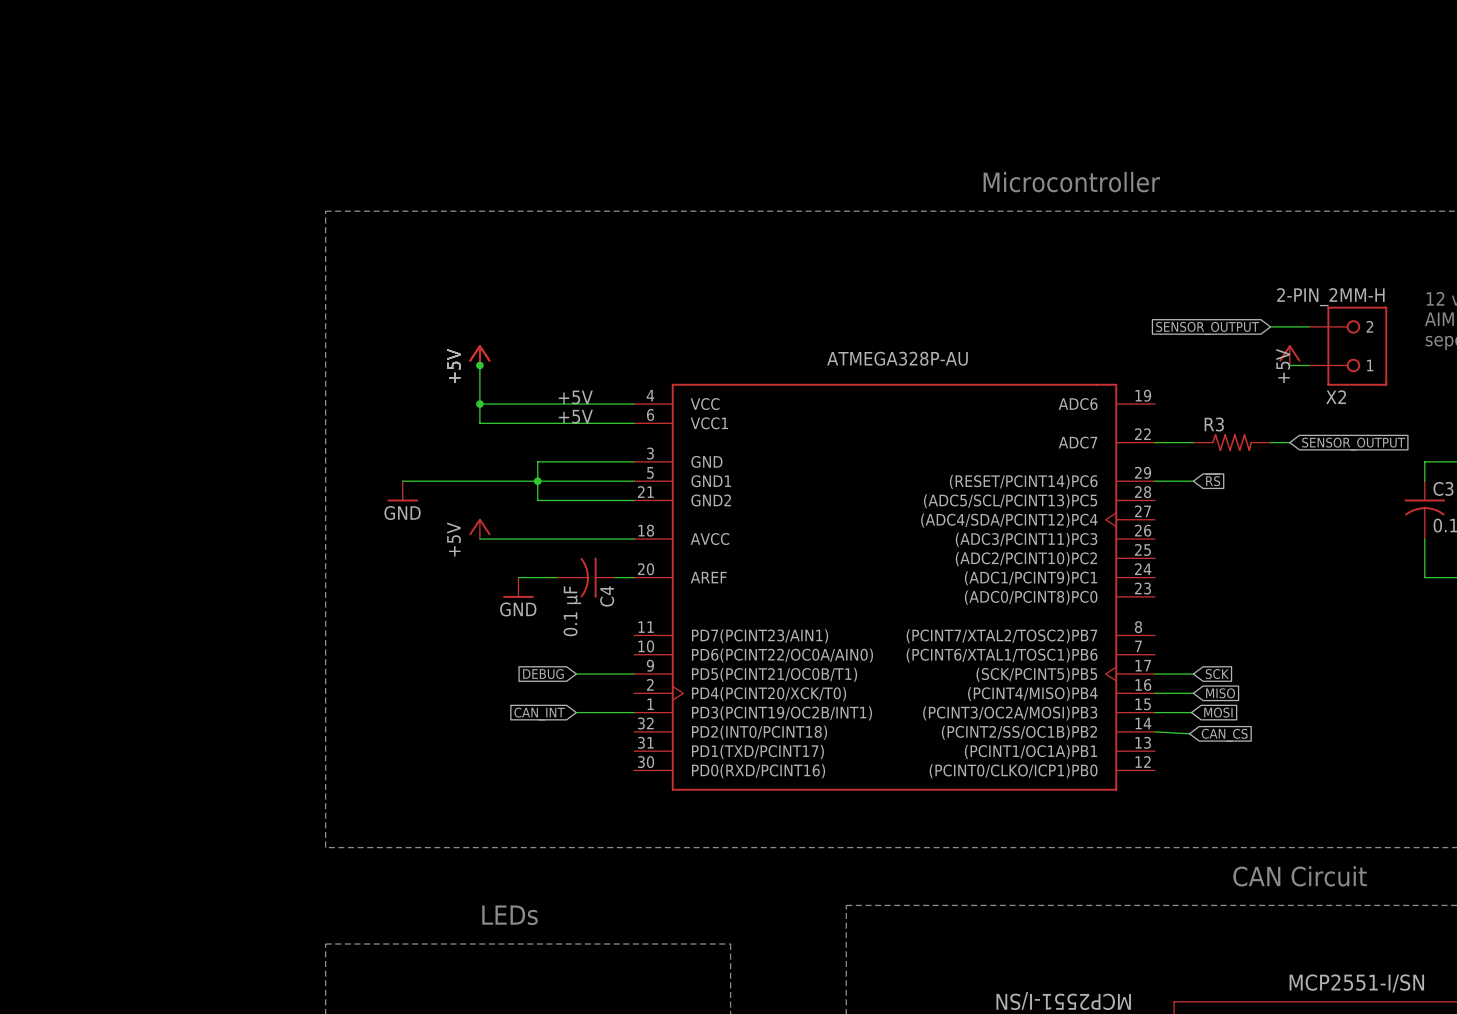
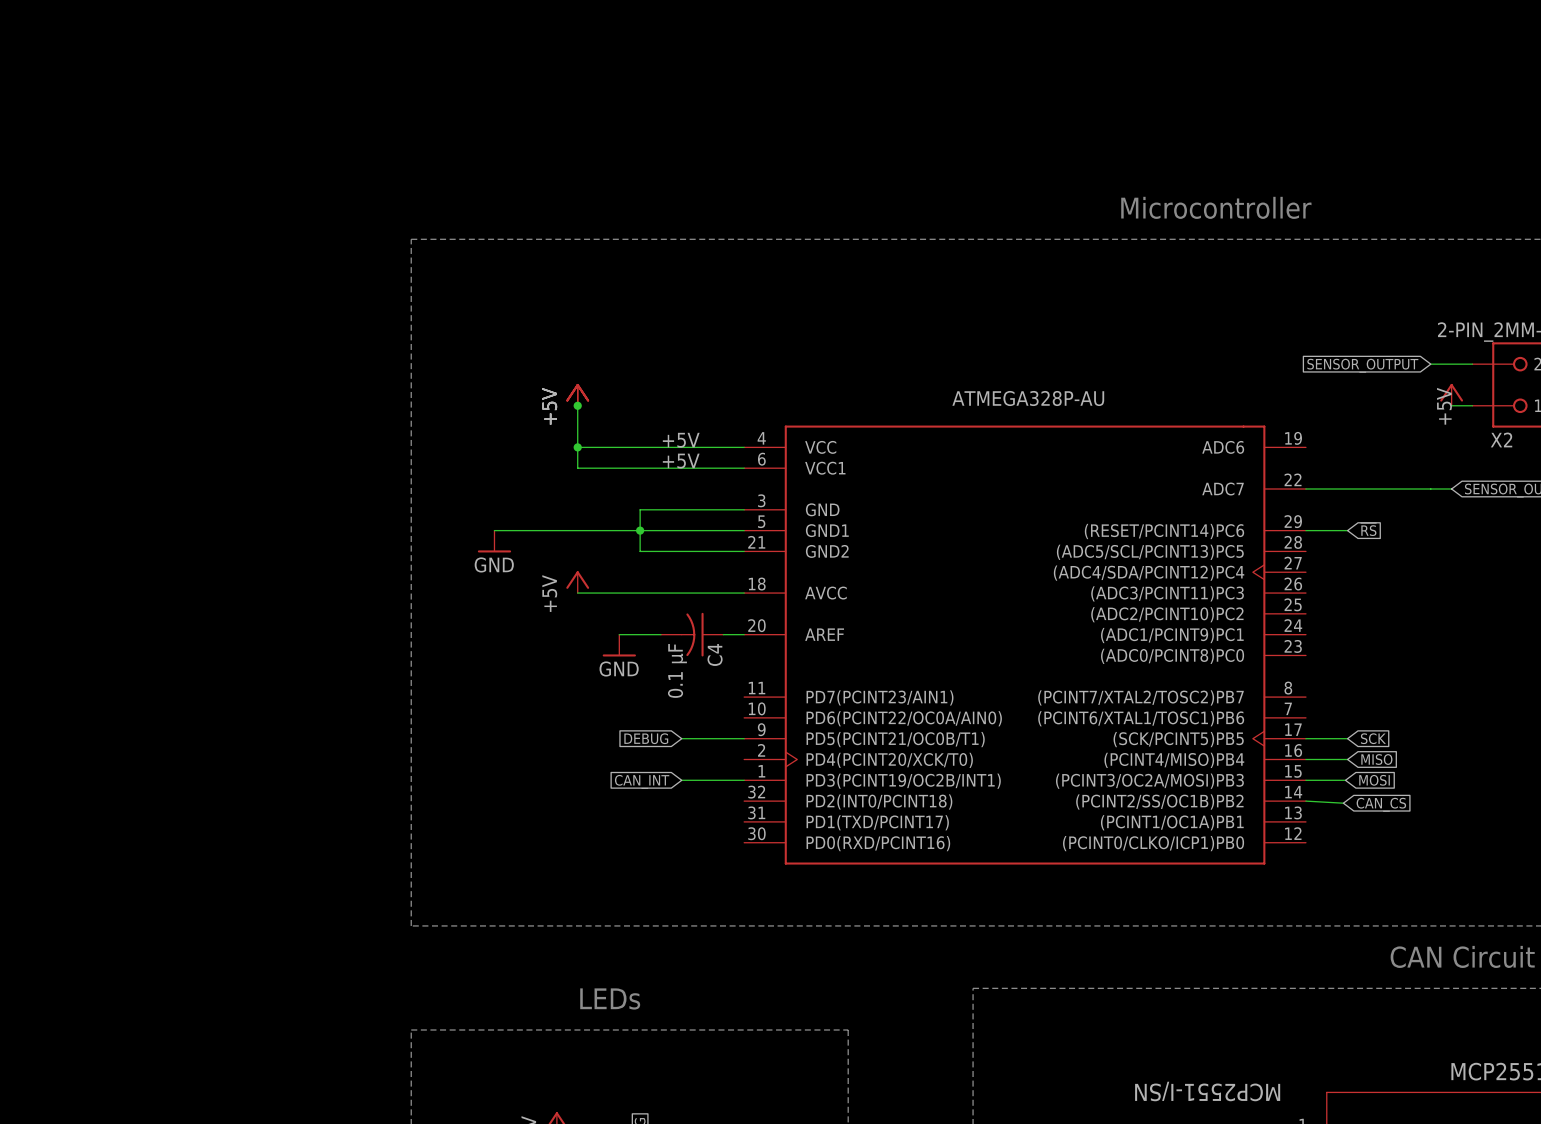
R3: (1231, 442) -> none

